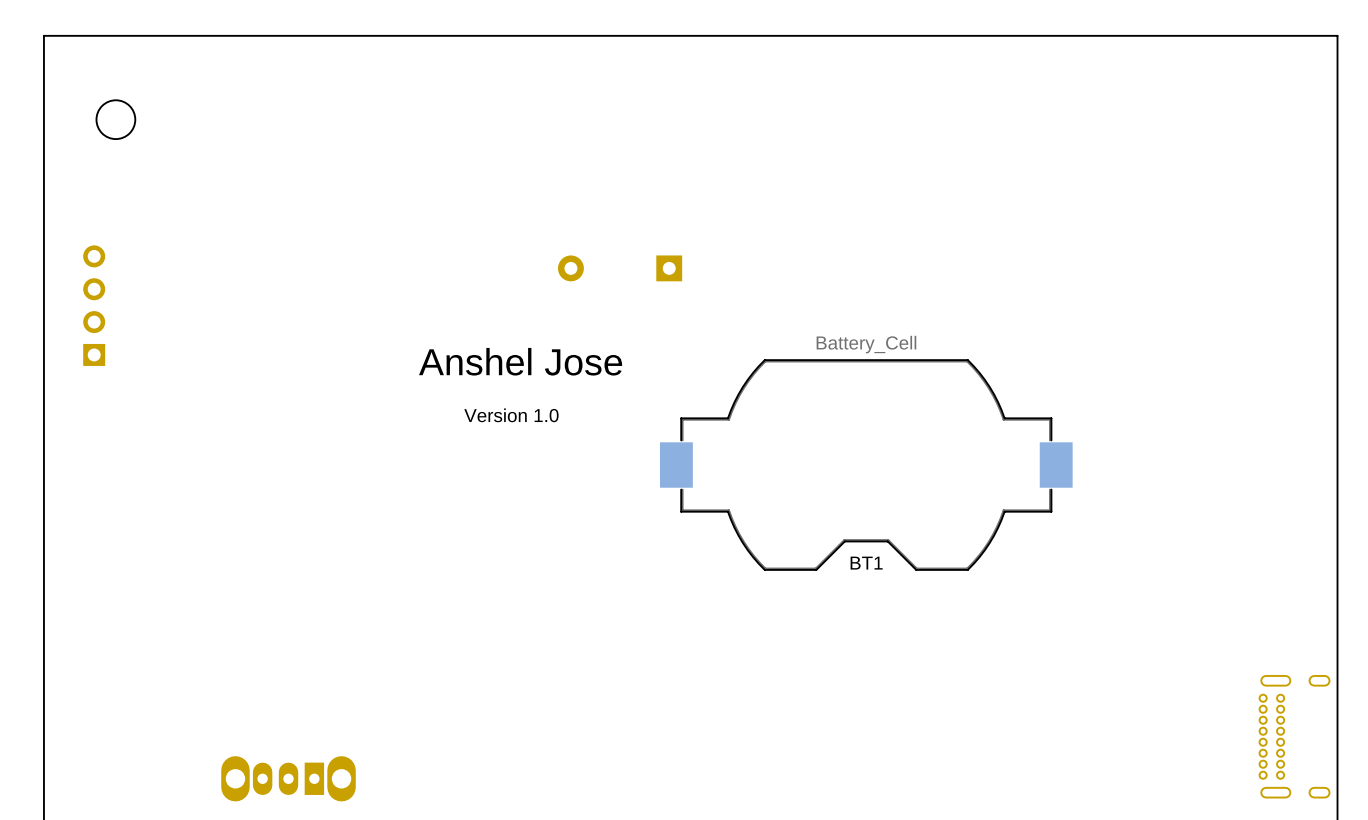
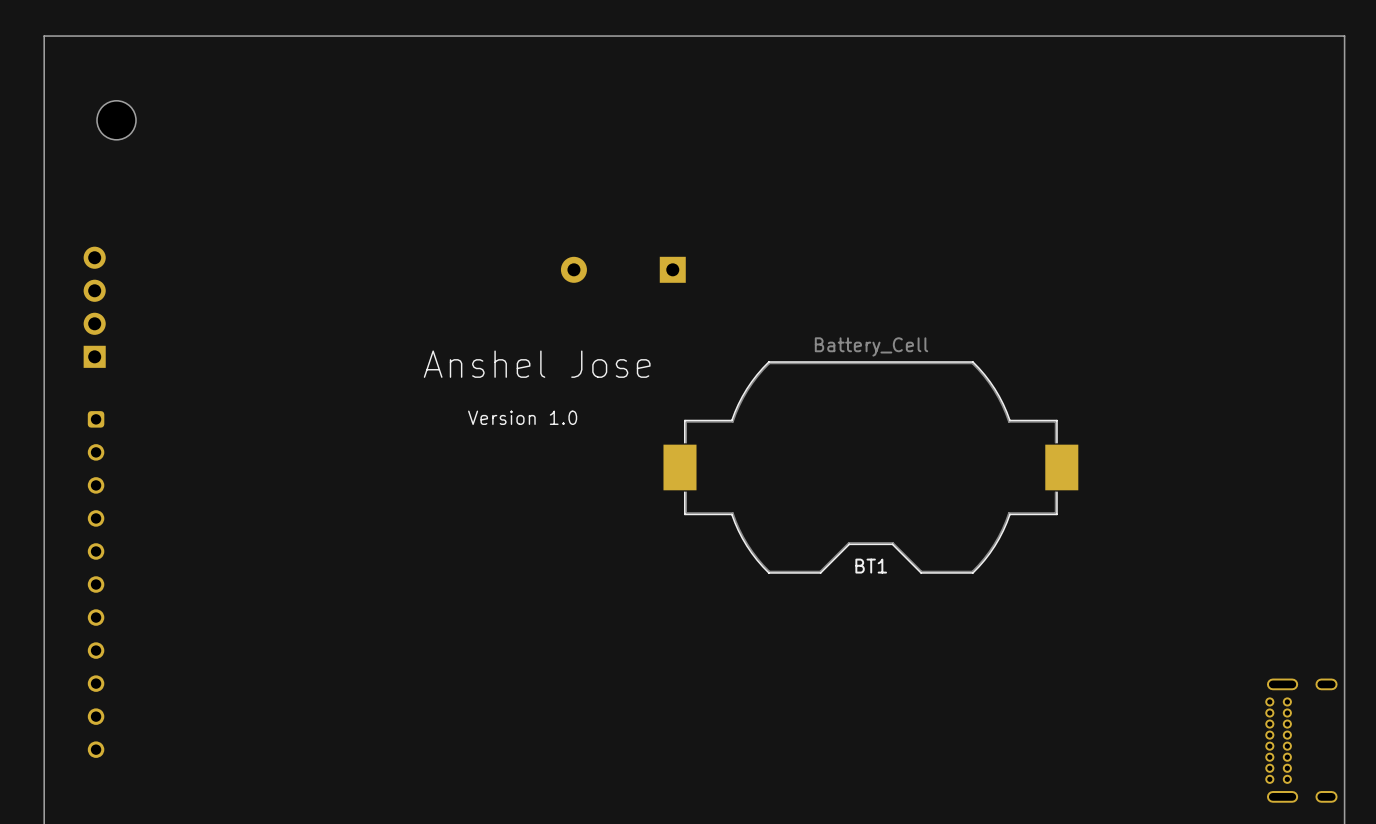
part: none -> (96, 584)
part: (288, 778) -> none

